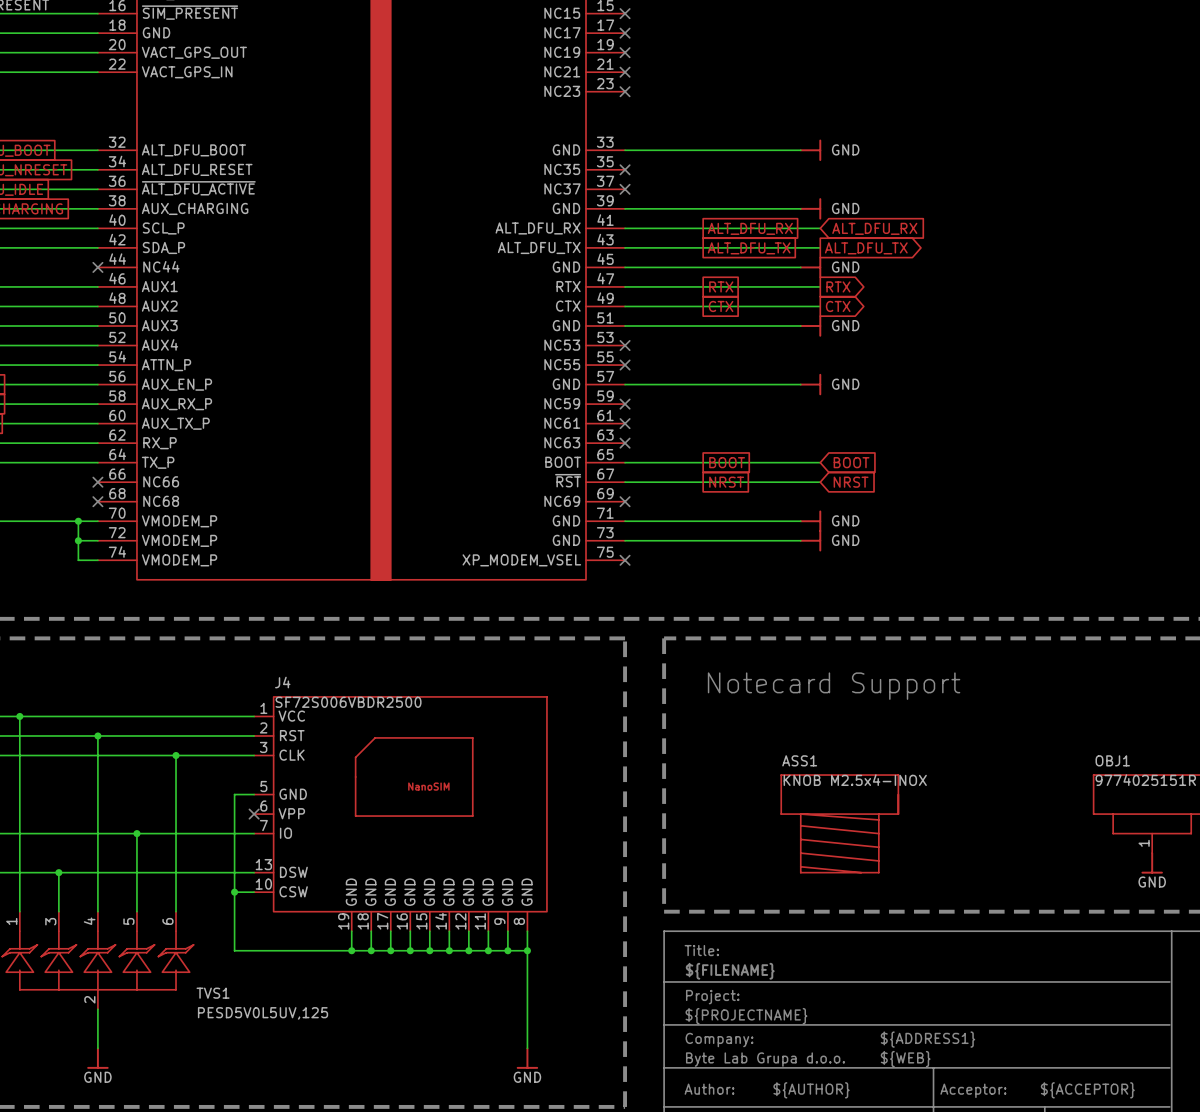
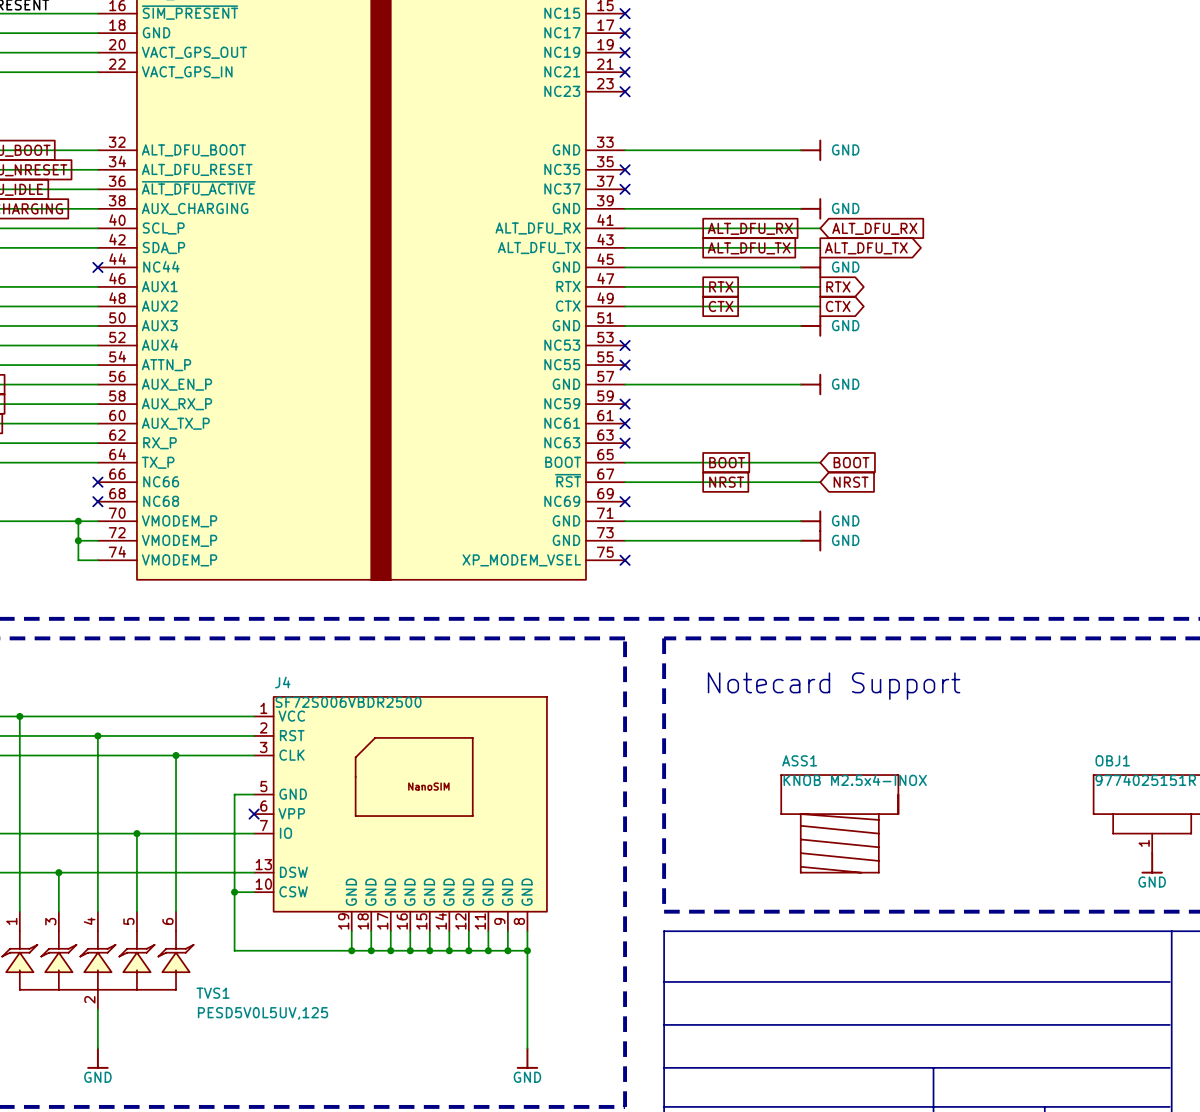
text: Title: (701, 950) -> none
text: ${FILENAME} (730, 971) -> none
text: Project: (712, 997) -> none
text: ${PROJECTNAME} (746, 1016) -> none
text: ${ADDRESS1} (927, 1039) -> none
text: Company: (719, 1040) -> none
text: Byte Lab Grupa d.o.o. (765, 1059) -> none
text: ${WEB} (905, 1059) -> none
text: Author: (709, 1089) -> none
text: ${AUTHOR} (811, 1090) -> none
text: Acceptor: (973, 1090) -> none
text: ${ACCEPTOR} (1087, 1090) -> none

